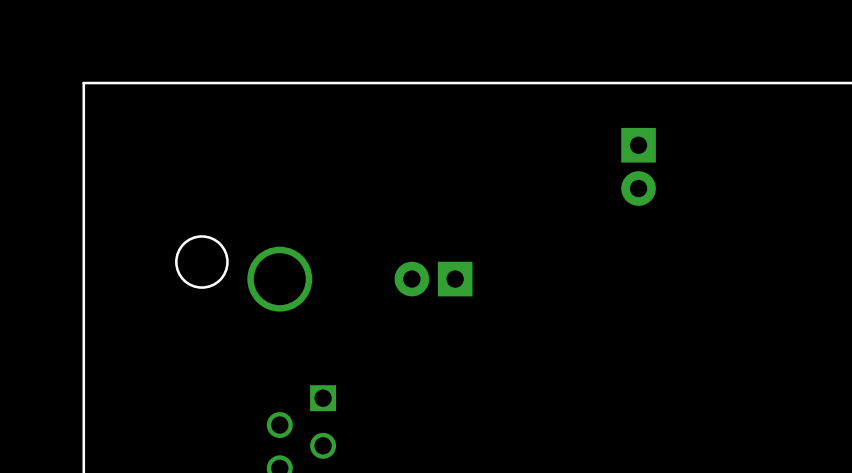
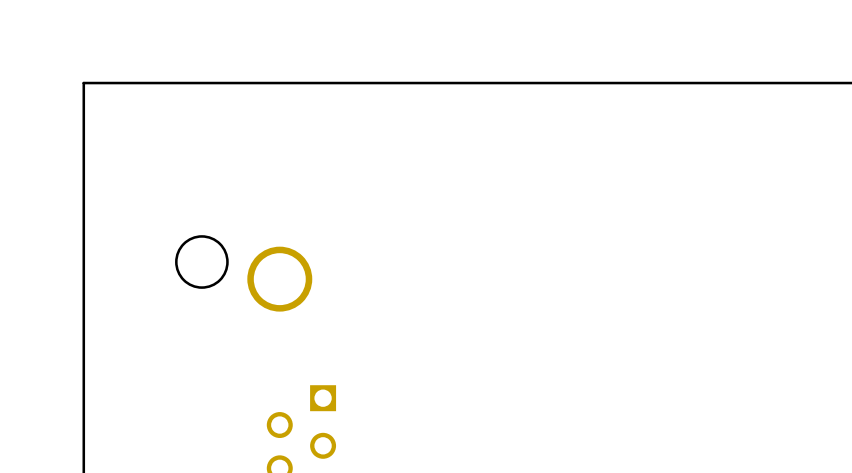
part: (638, 166) -> none
part: (433, 279) -> none

